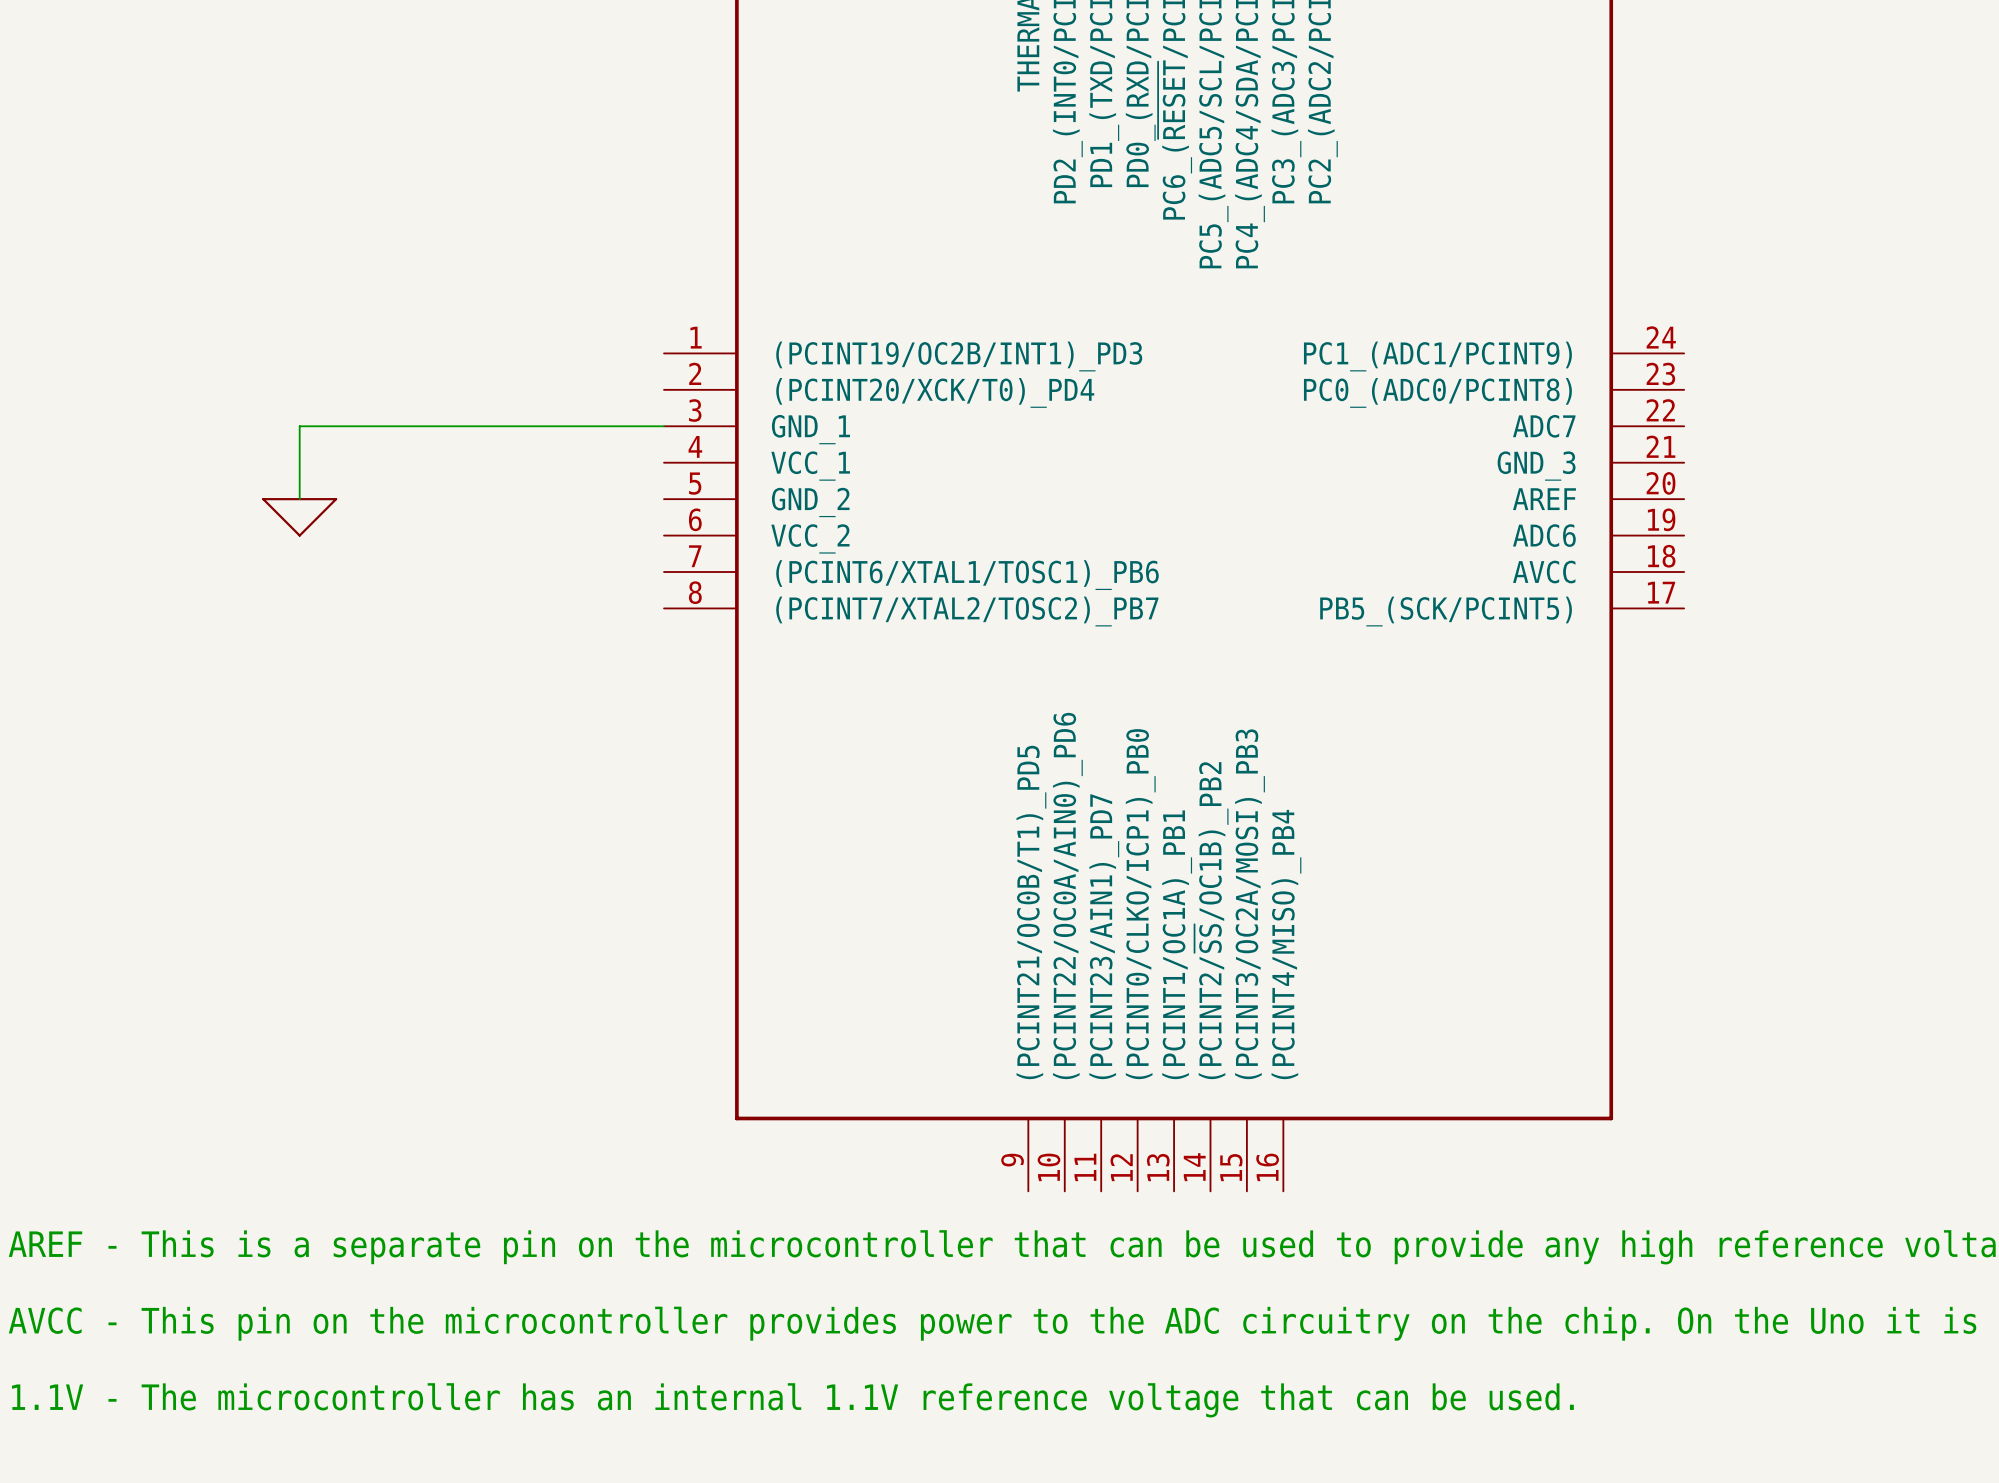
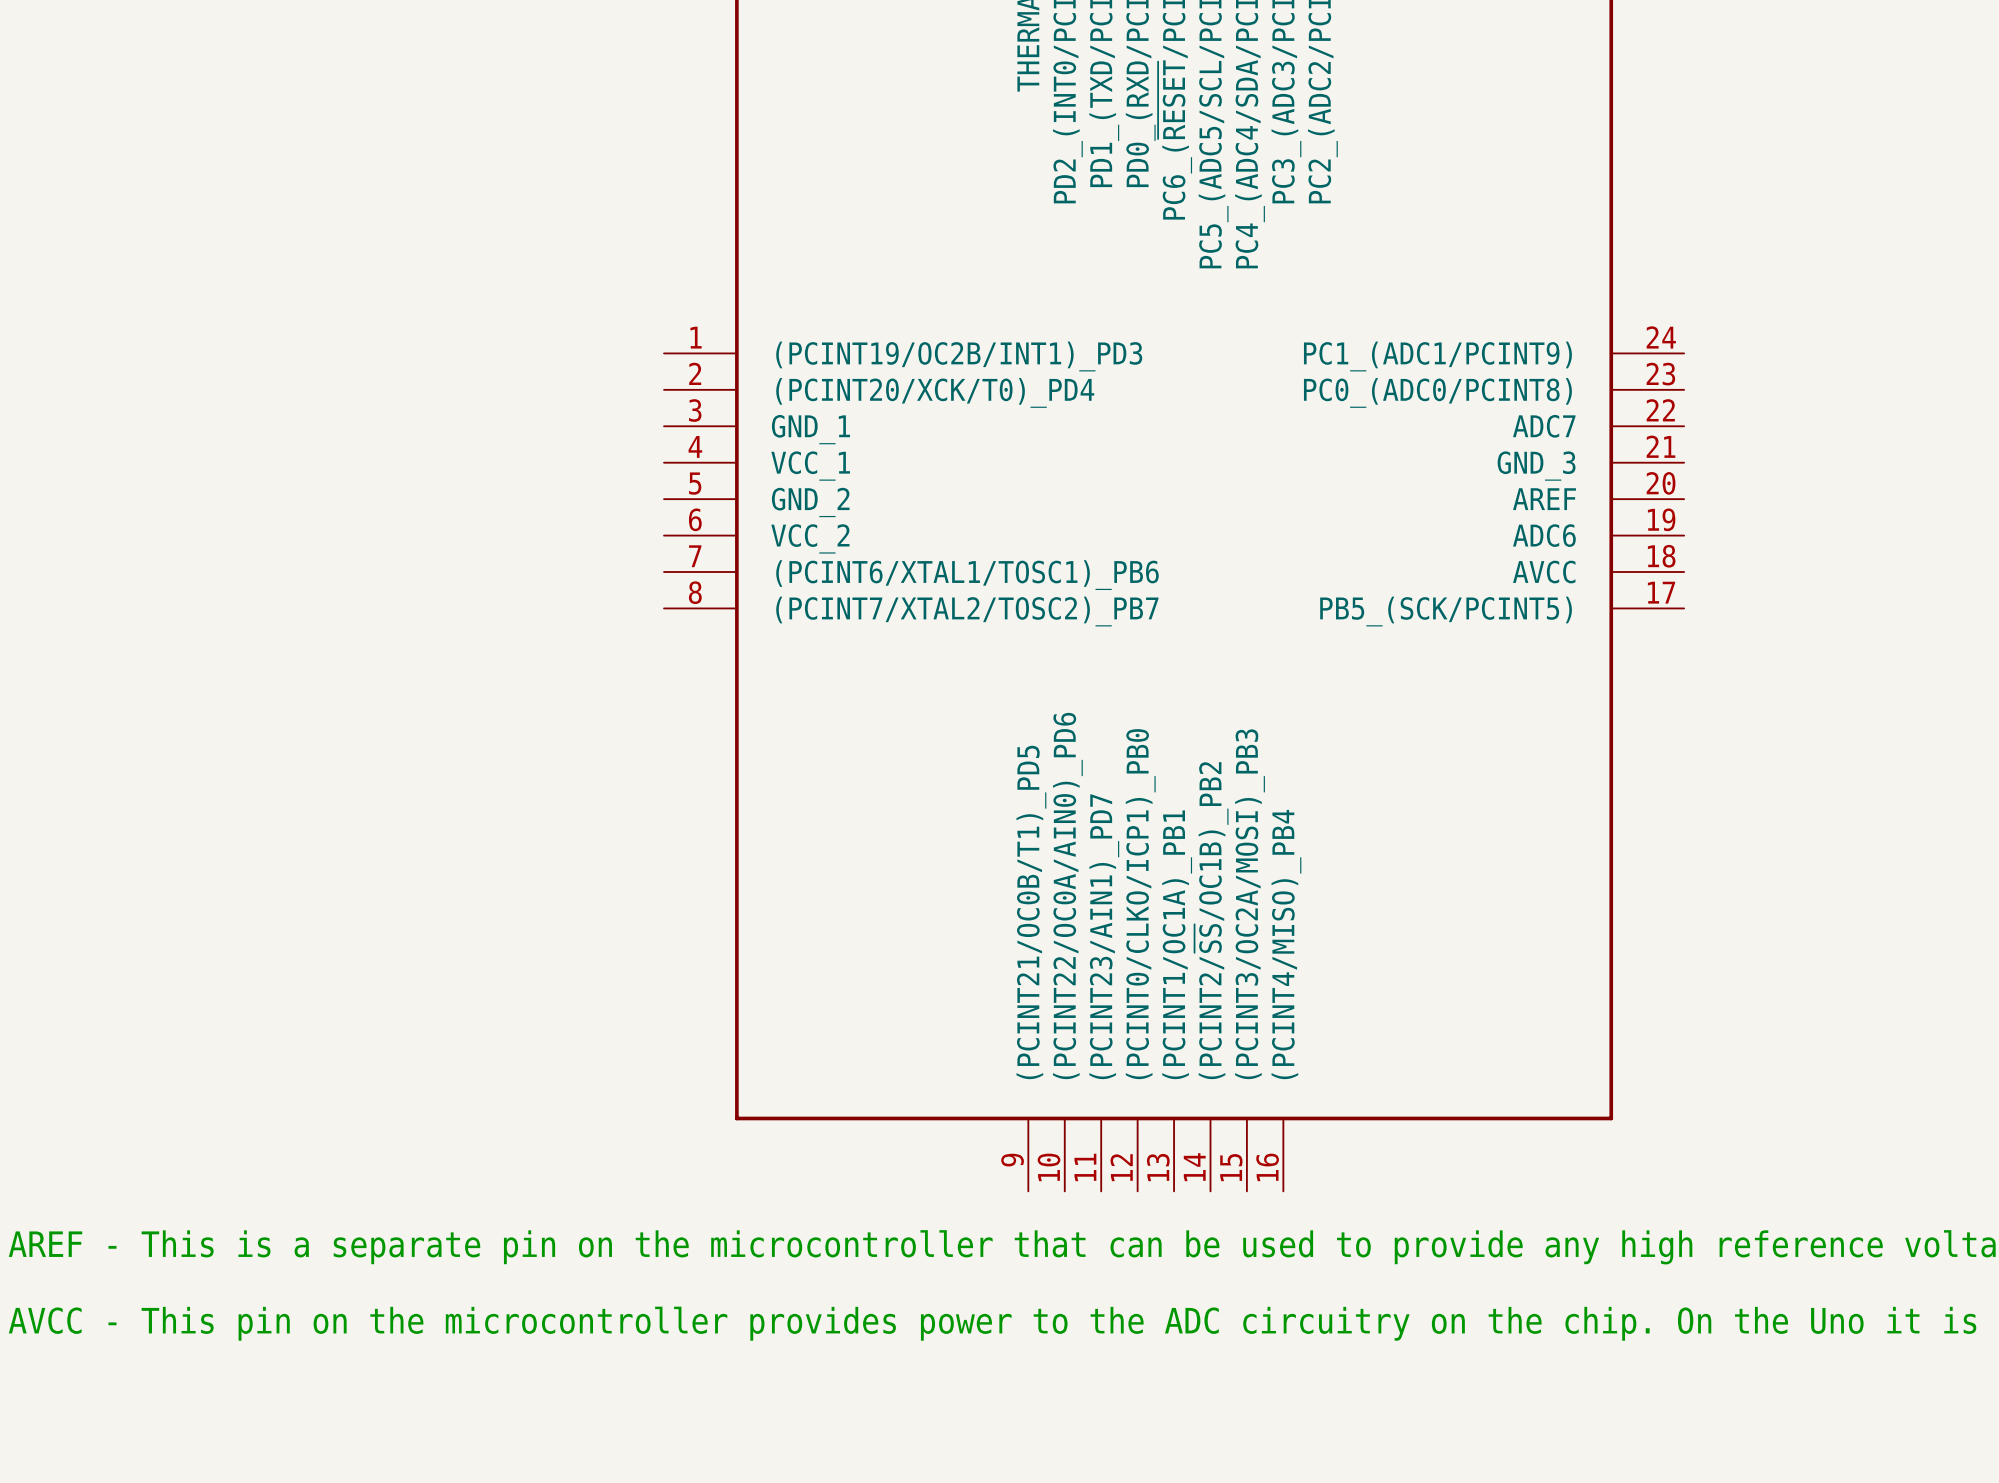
wire: (664, 426) (299, 426) (299, 499) -> none
power symbol: (299, 517) -> none
text: 1.1V - The microcontroller has an internal 1.1V reference voltage that can be used. (792, 1400) -> none

